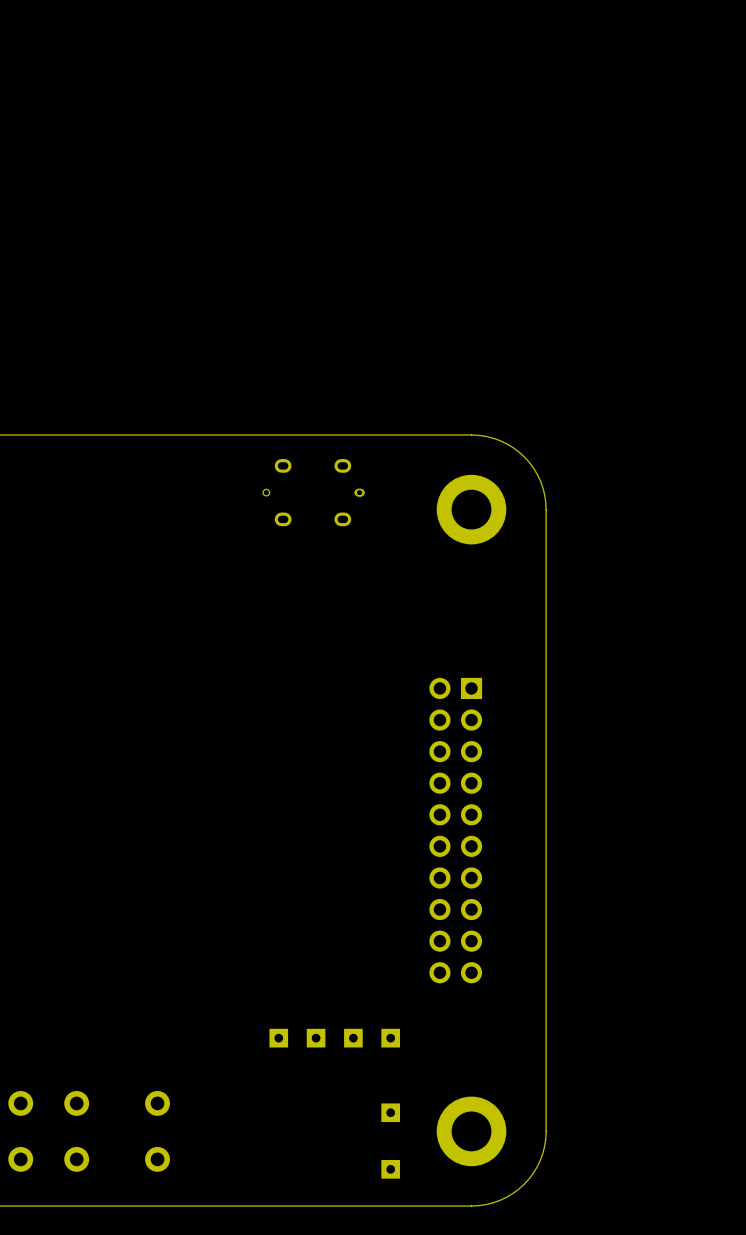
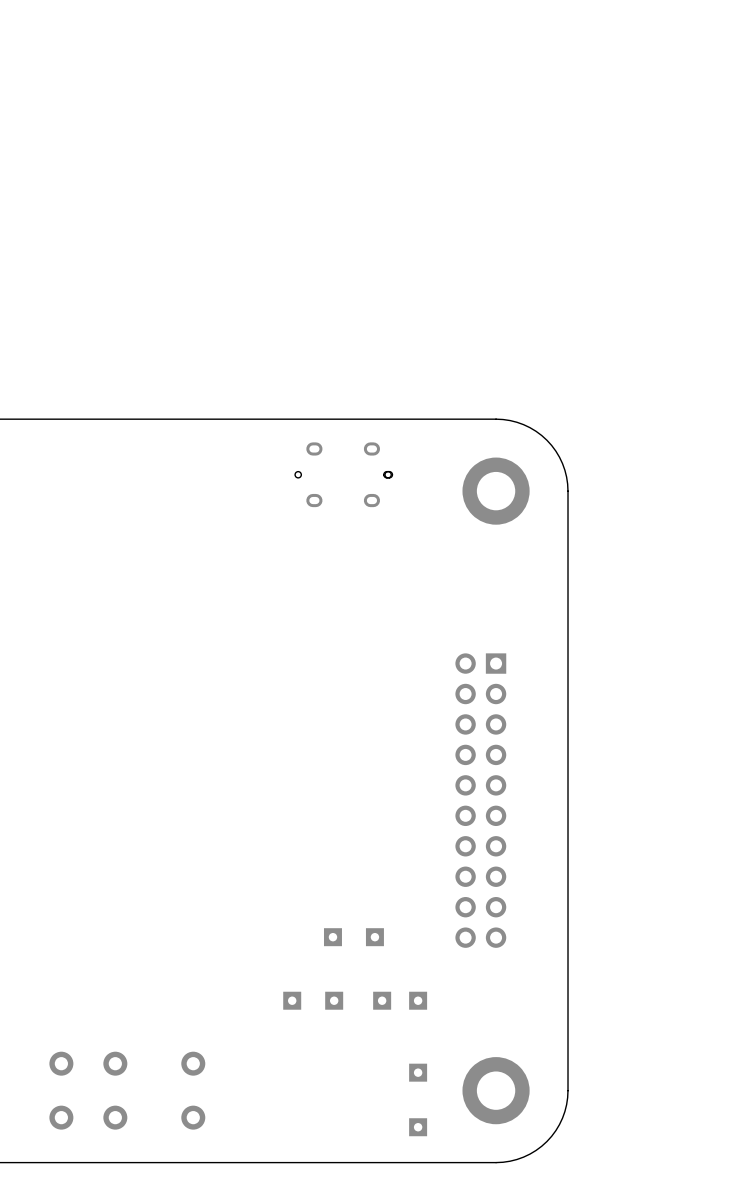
part: none -> (332, 937)
part: none -> (374, 937)
part: none -> (292, 1000)
part: (278, 1038) -> none
part: none -> (334, 1000)
part: (316, 1038) -> none

